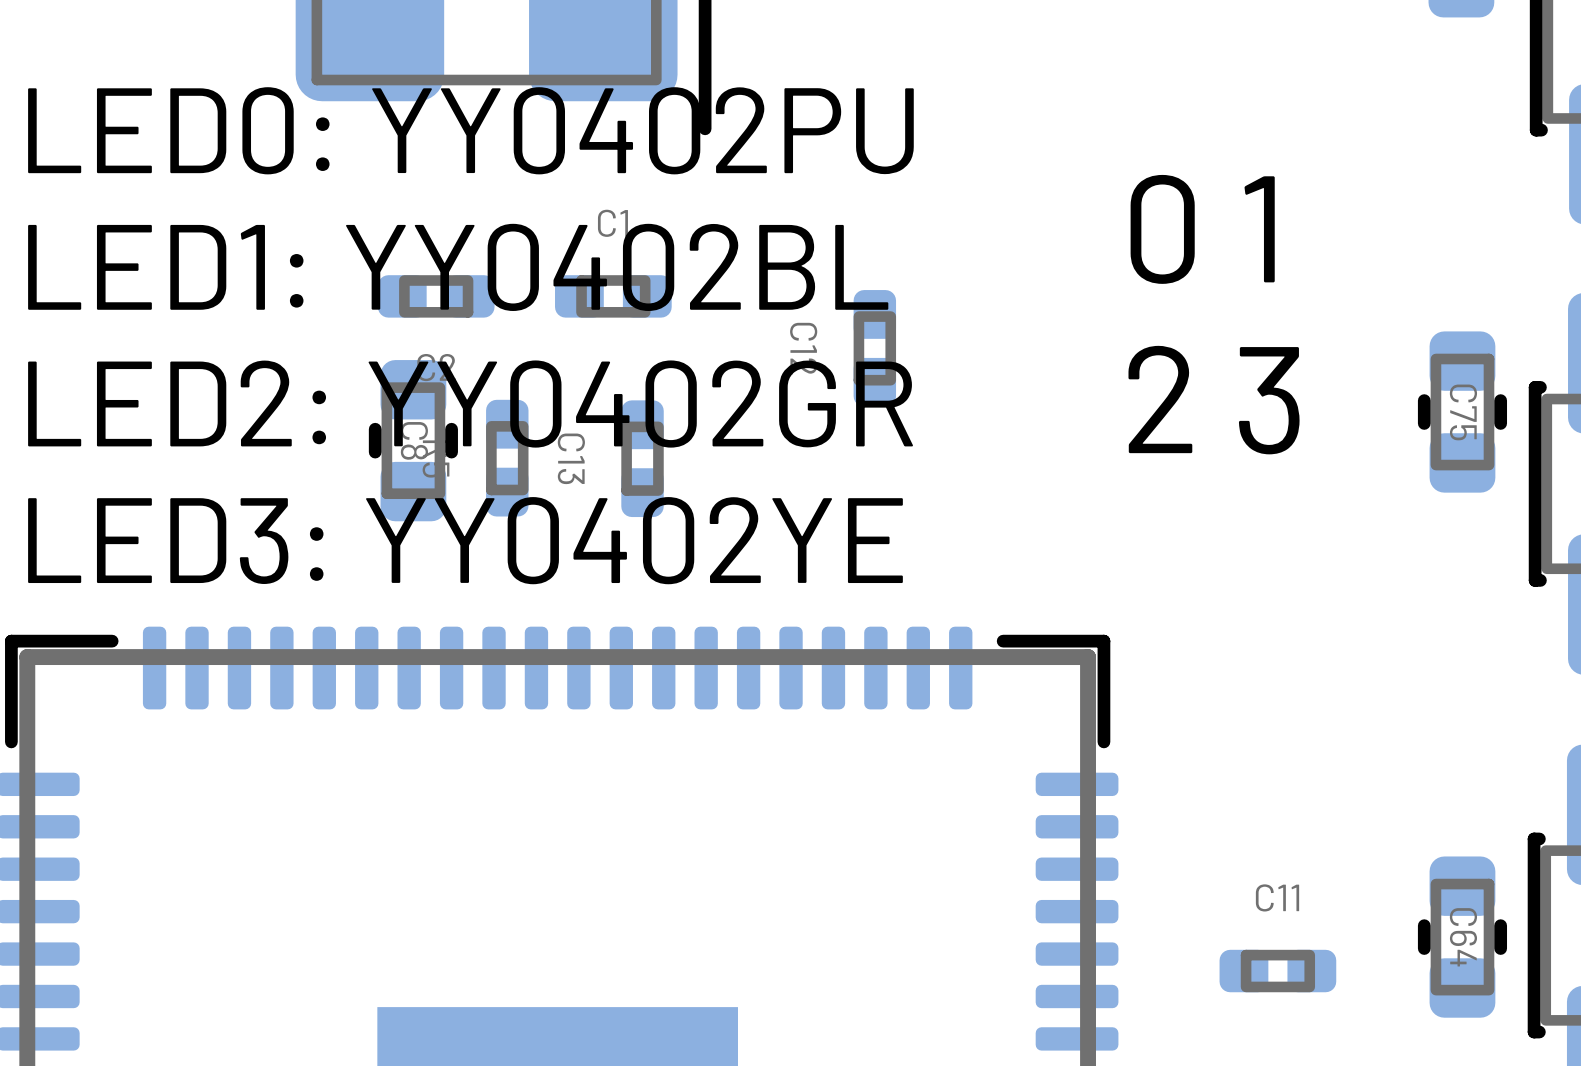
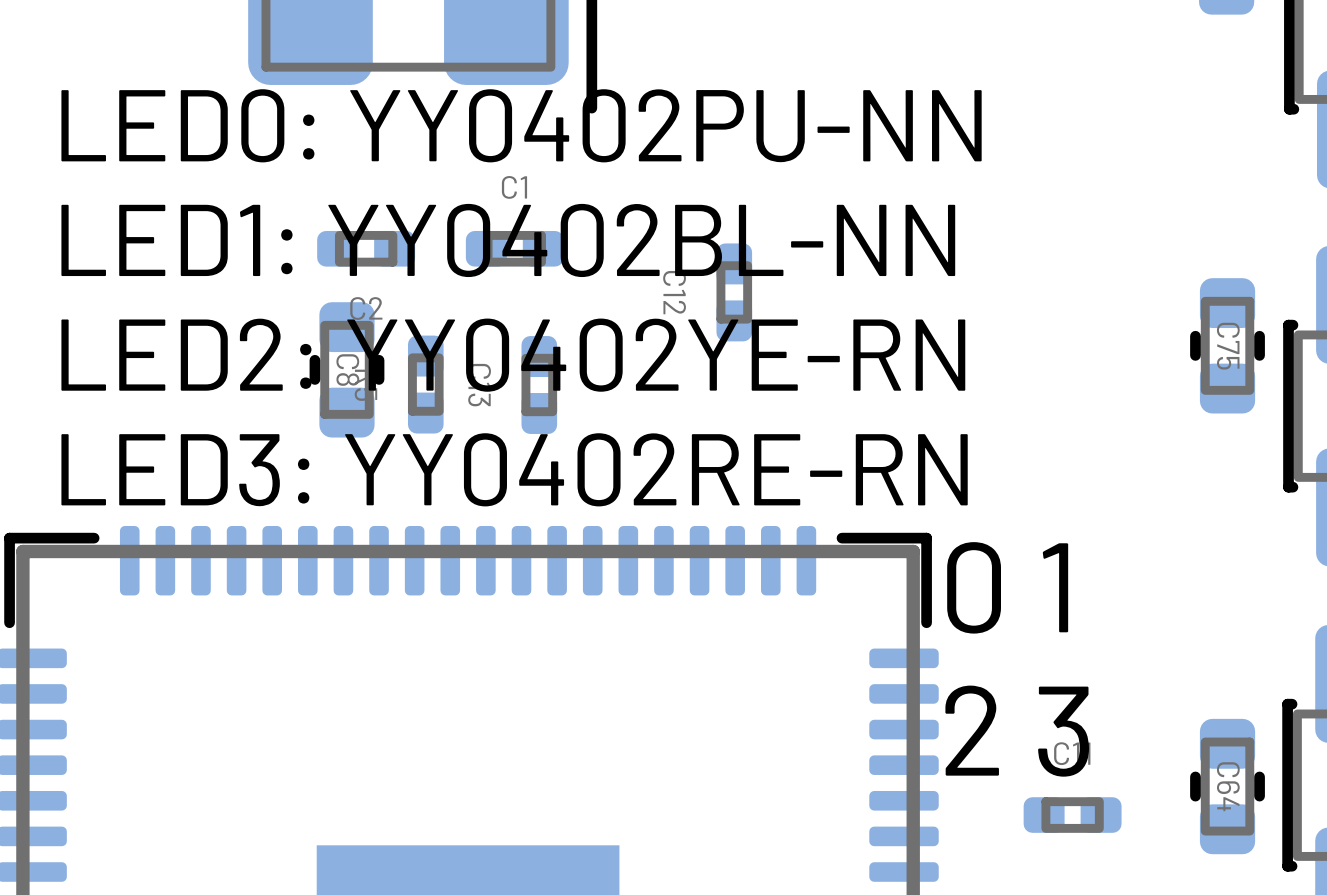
text: LED0: YY0402PU (470, 130) -> LED0: YY0402PU-NN (521, 125)
text position: 0 1 (1202, 229) -> 0 1 (1007, 587)
text: LED1: YY0402BL (458, 267) -> LED1: YY0402BL-NN (508, 240)
text position: 2 3 (1214, 400) -> 2 3 (1017, 731)
text: LED2: YY0402GR (470, 404) -> LED2: YY0402YE-RN (513, 355)
text: LED3: YY0402YE (465, 540) -> LED3: YY0402RE-RN (514, 469)

